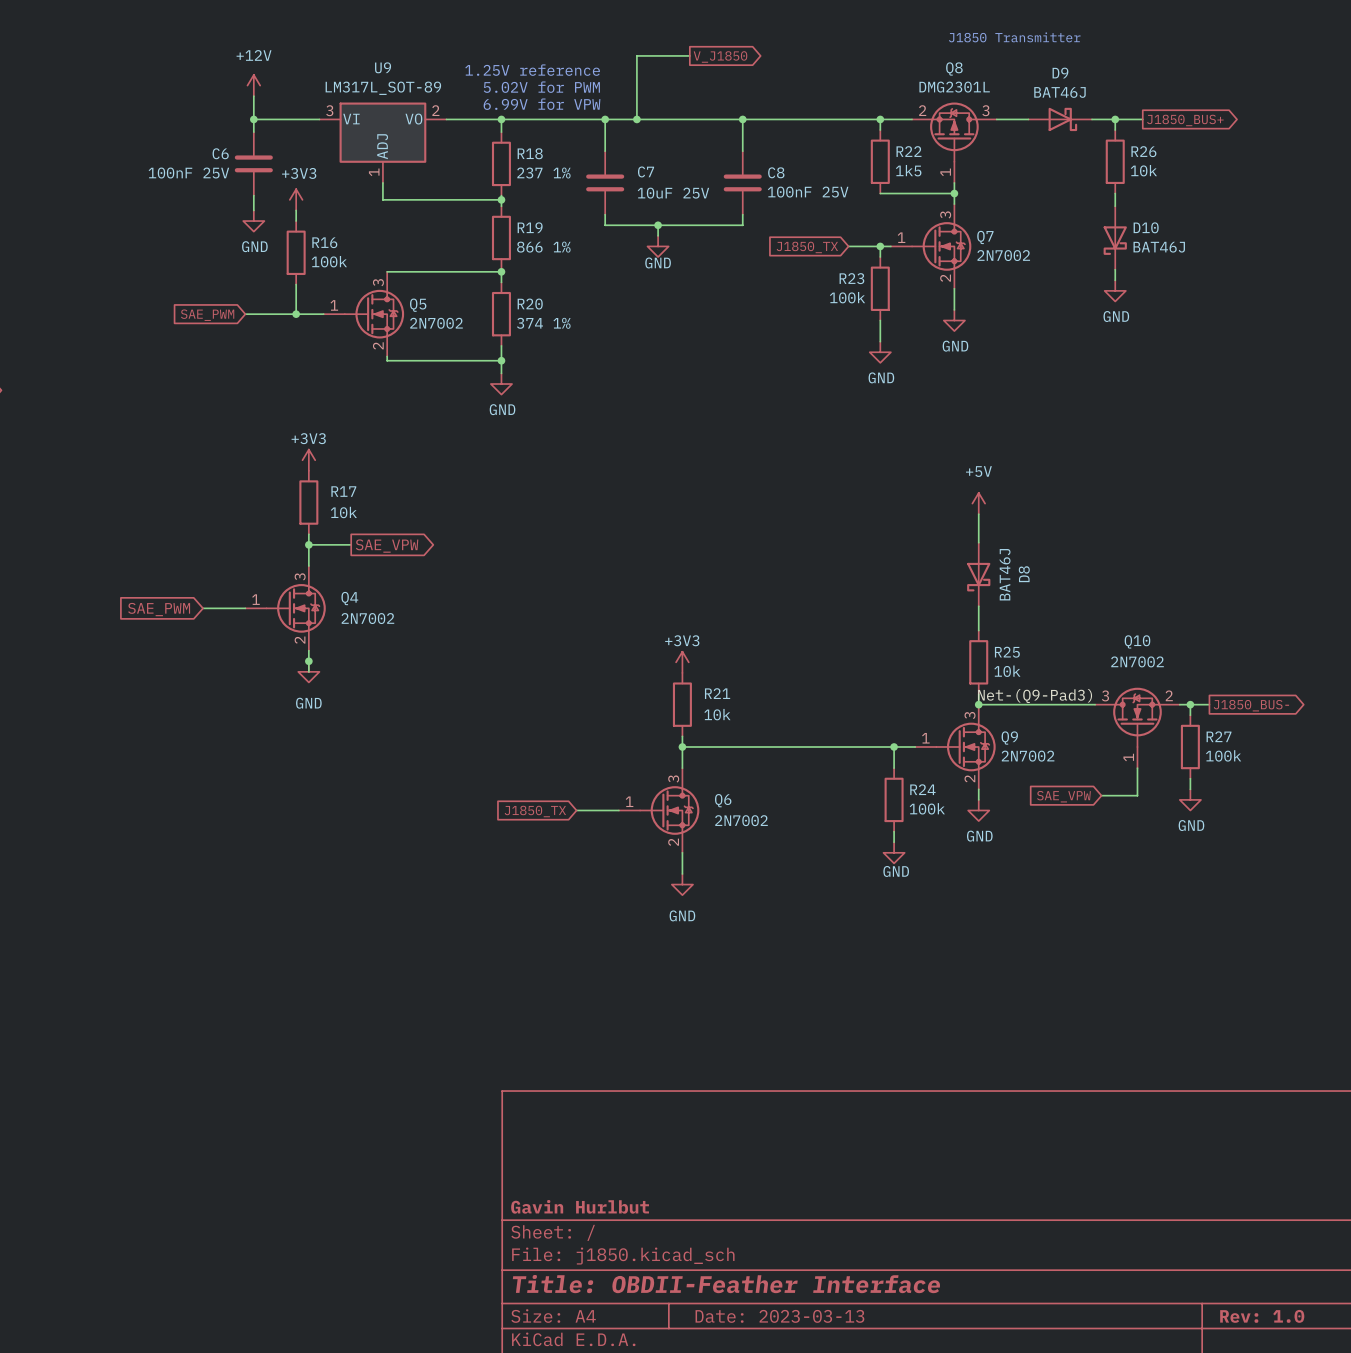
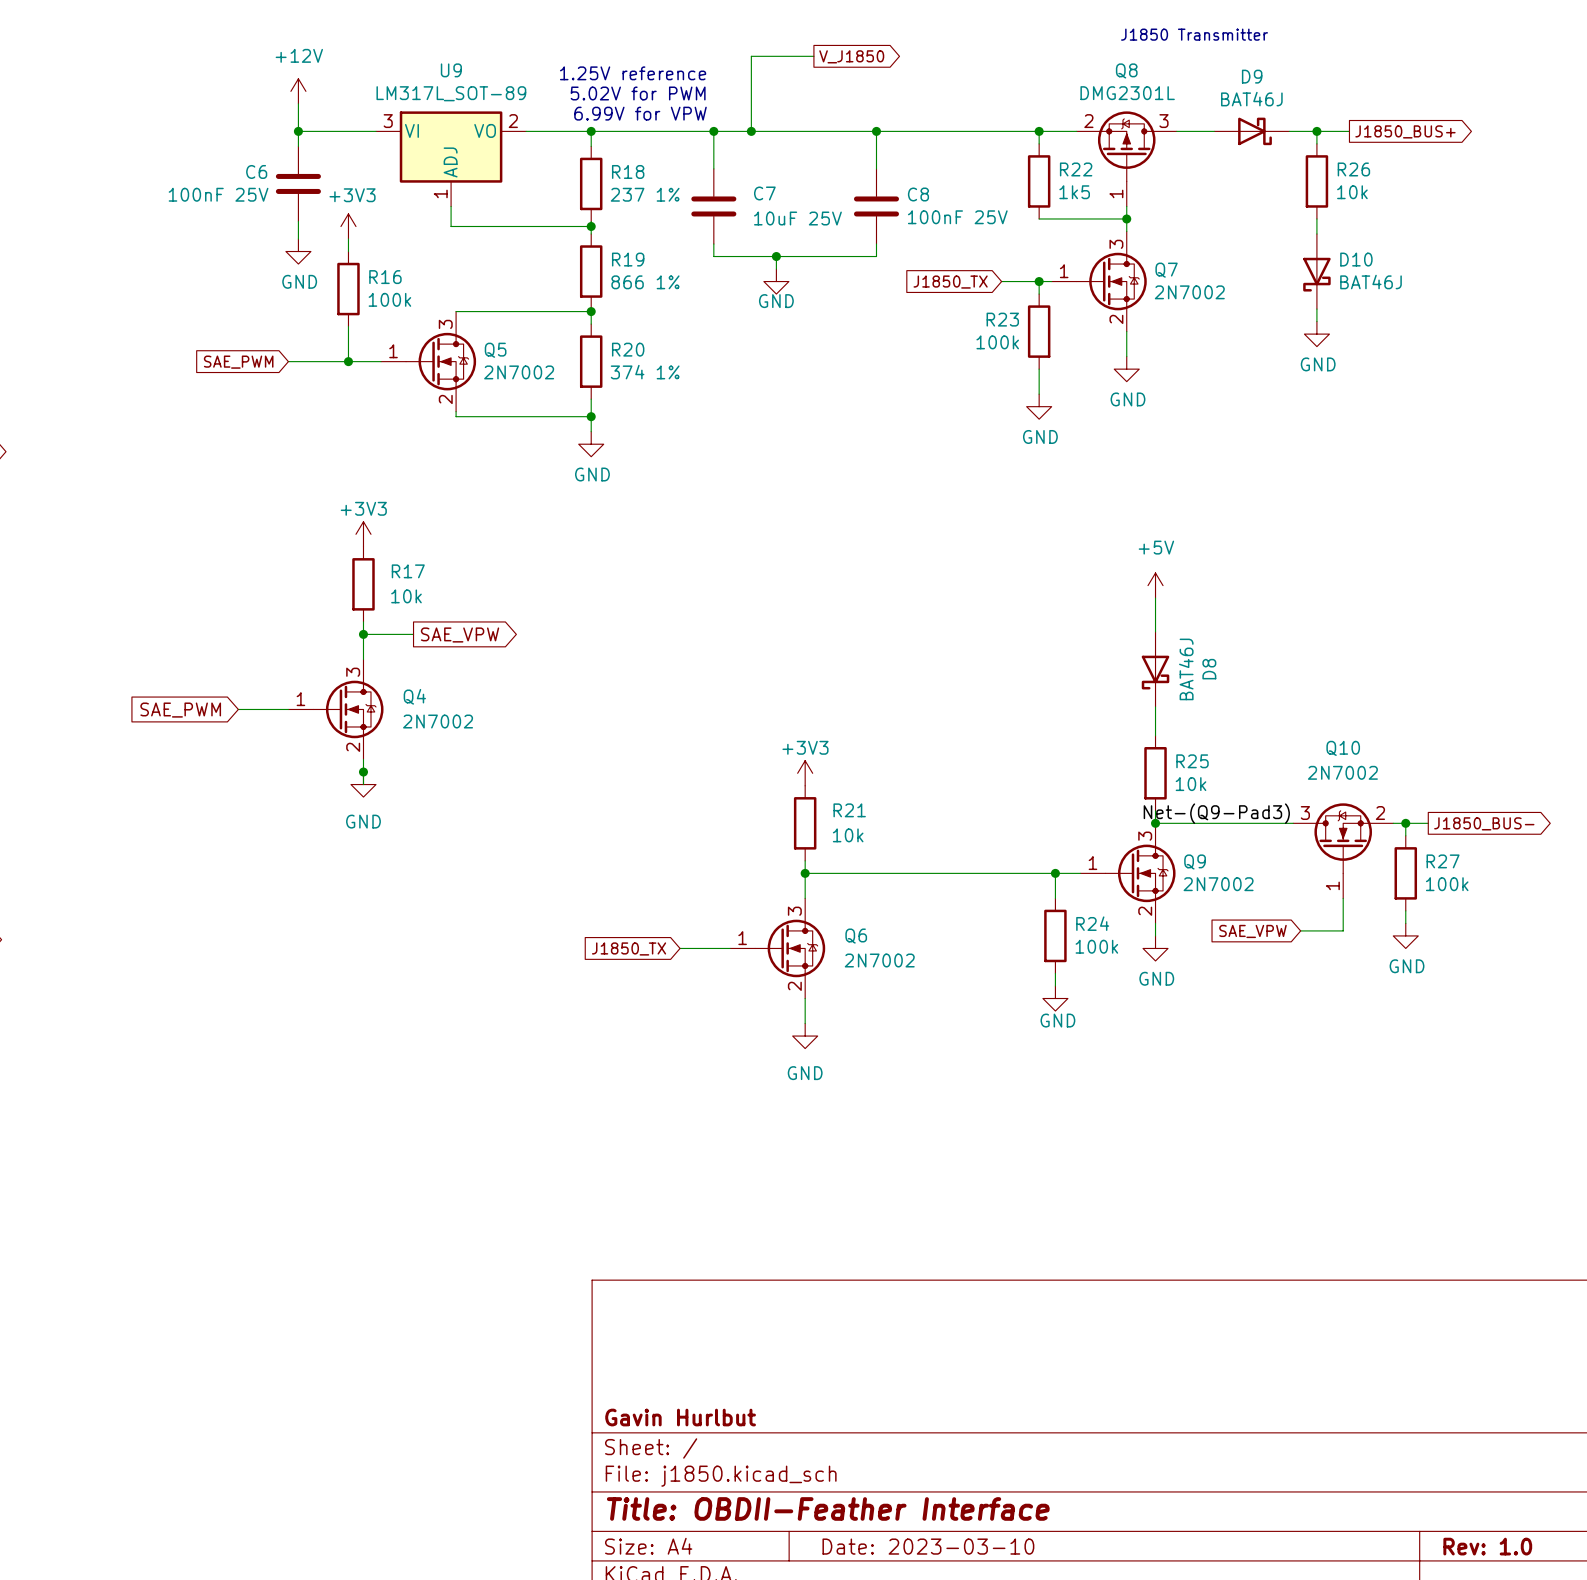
title block: Date: 2023-03-13 (779, 1316) -> Date: 2023-03-10 (928, 1546)

